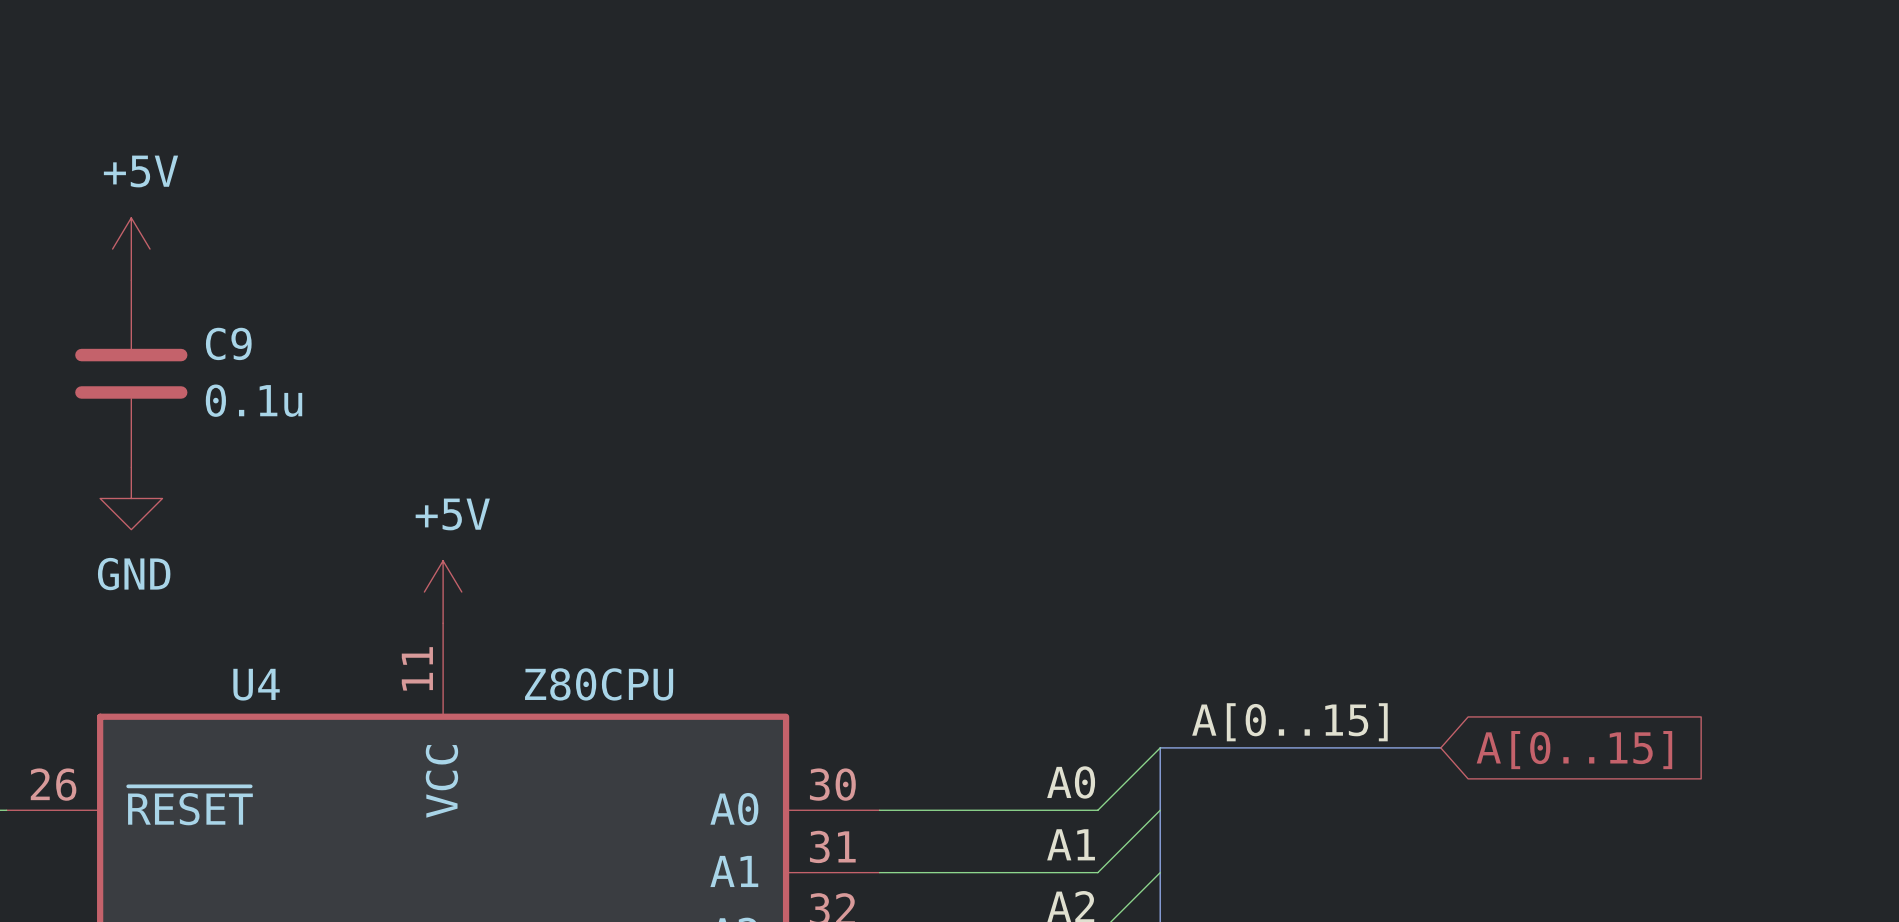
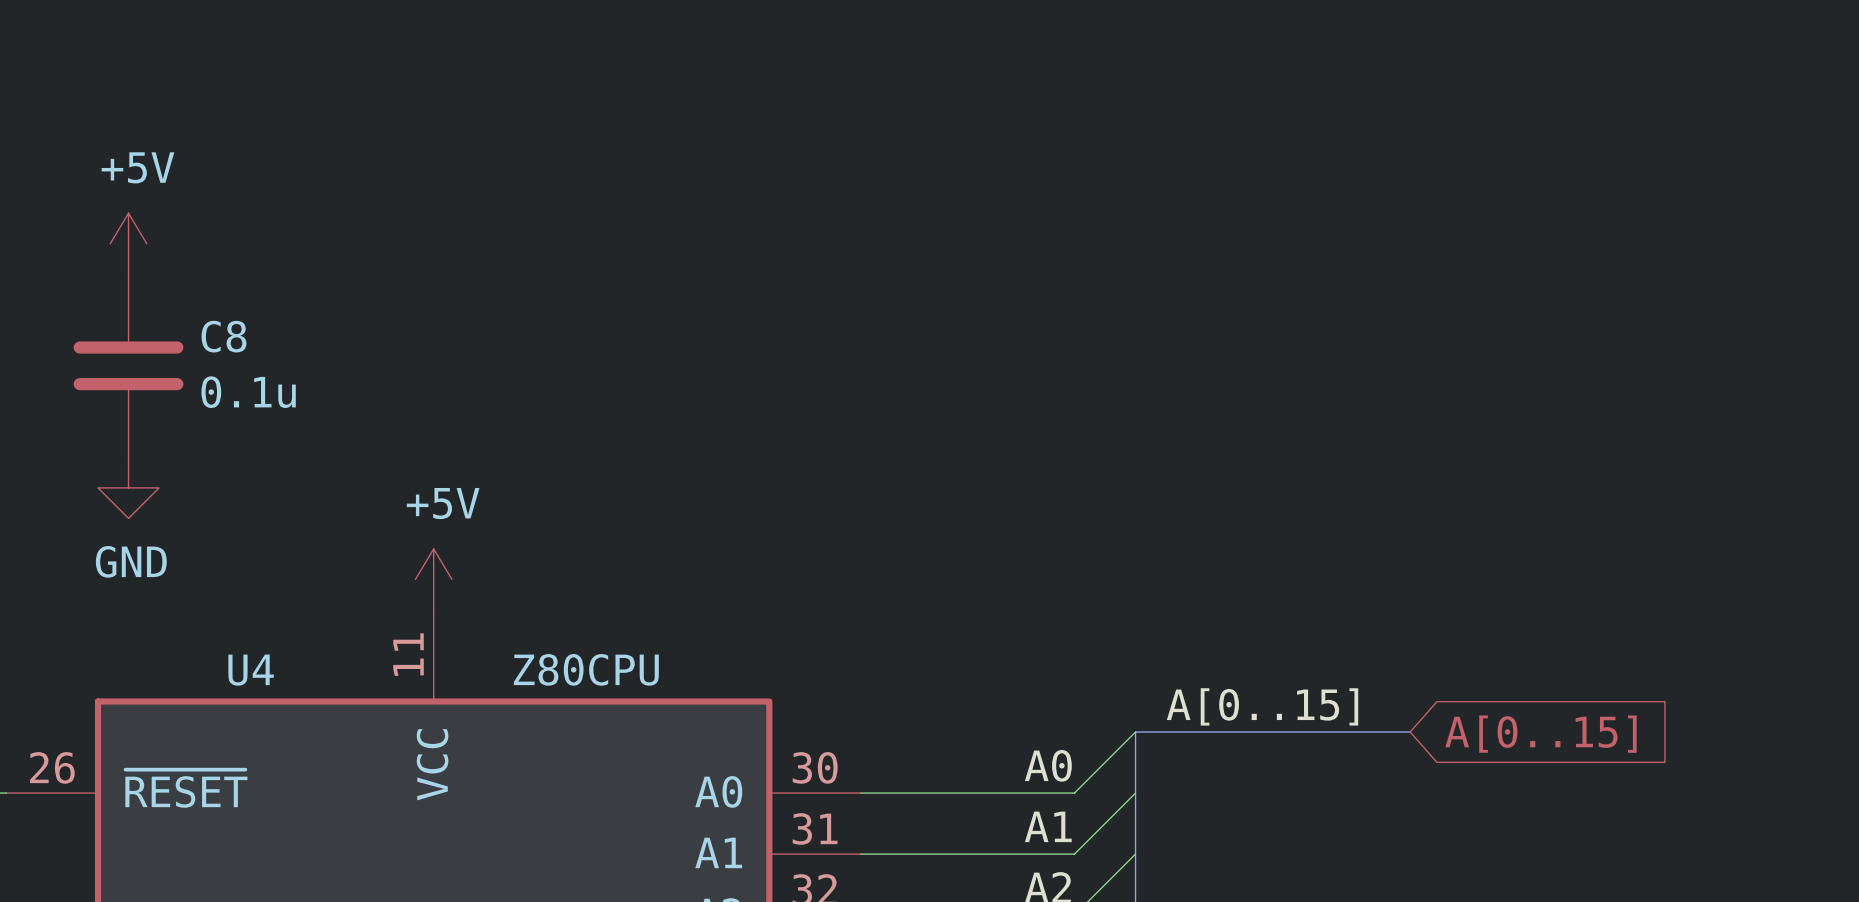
C9 name: C9 (228, 343) -> C8 (223, 336)

